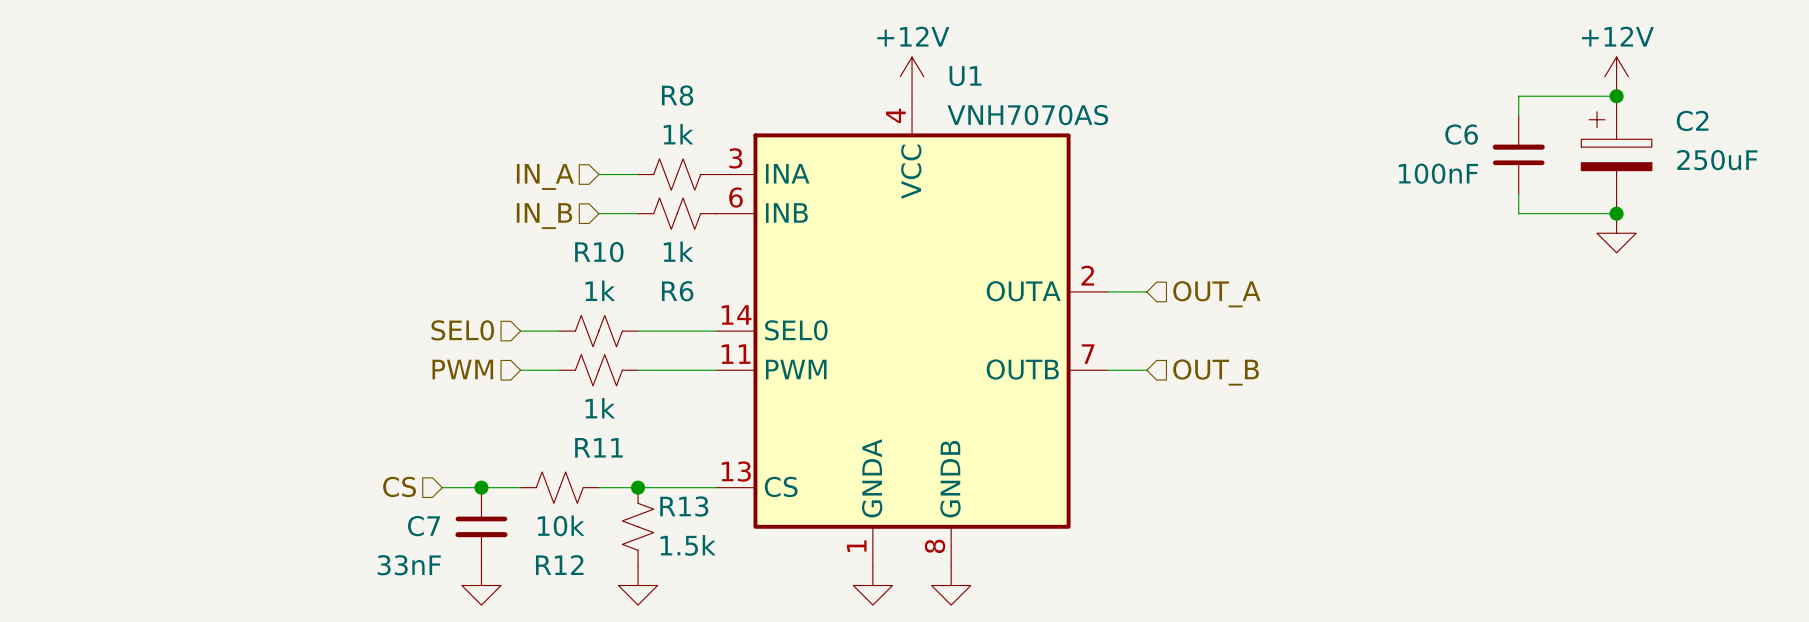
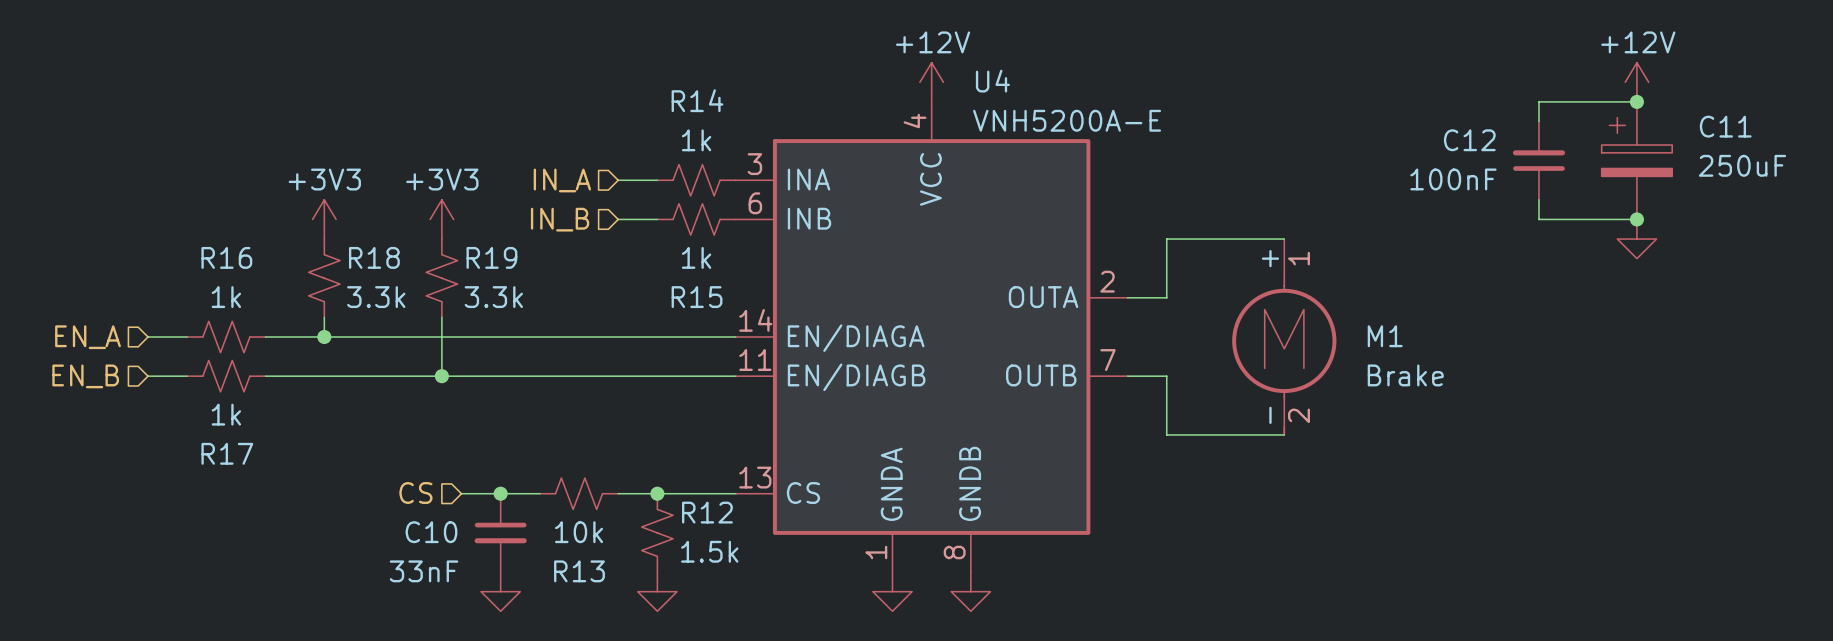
U1 name: U1 (965, 76) -> U4 (992, 81)
R8 name: R8 (677, 95) -> R14 (697, 100)
U1 value: VNH7070AS (1027, 115) -> VNH5200A-E (1067, 120)
C2 name: C2 (1692, 120) -> C11 (1725, 126)
C6 name: C6 (1461, 134) -> C12 (1469, 140)
power symbol: none -> +3V3 (324, 219)
power symbol: none -> +3V3 (441, 219)
wire: none -> (1284, 239) (1166, 239) (1166, 297)
R18: none -> 3.3k (324, 278)
R19: none -> 3.3k (441, 278)
R6 name: R6 (677, 291) -> R15 (697, 297)
hierarchical label: OUT_A (1216, 294) -> none
wire: none -> (324, 317) (324, 337)
wire: none -> (441, 317) (441, 376)
hierarchical label: SEL0 (462, 330) -> none
U1 pin name: SEL0 (796, 330) -> EN/DIAGA (856, 338)
wire: none -> (148, 337) (187, 337)
R16: none -> 1k (226, 337)
wire: none -> (265, 337) (539, 337)
junction: none -> (324, 337)
wire: none -> (579, 337) (657, 337)
R10: 1k (598, 331) -> none
M1: none -> Brake (1284, 337)
hierarchical label: none -> EN_A (88, 337)
hierarchical label: PWM (462, 369) -> none
U1 pin name: PWM (796, 369) -> EN/DIAGB (856, 377)
wire: none -> (148, 376) (187, 376)
R17: none -> 1k (226, 376)
wire: none -> (265, 376) (539, 376)
junction: none -> (441, 376)
wire: none -> (579, 376) (657, 376)
R11: 1k (598, 370) -> none
wire: none -> (1166, 376) (1166, 434) (1284, 434)
hierarchical label: none -> EN_B (85, 376)
hierarchical label: OUT_B (1216, 372) -> none
R13 name: R13 (684, 506) -> R12 (707, 512)
C7 name: C7 (424, 526) -> C10 (431, 532)
R12 name: R12 (559, 565) -> R13 (579, 571)

